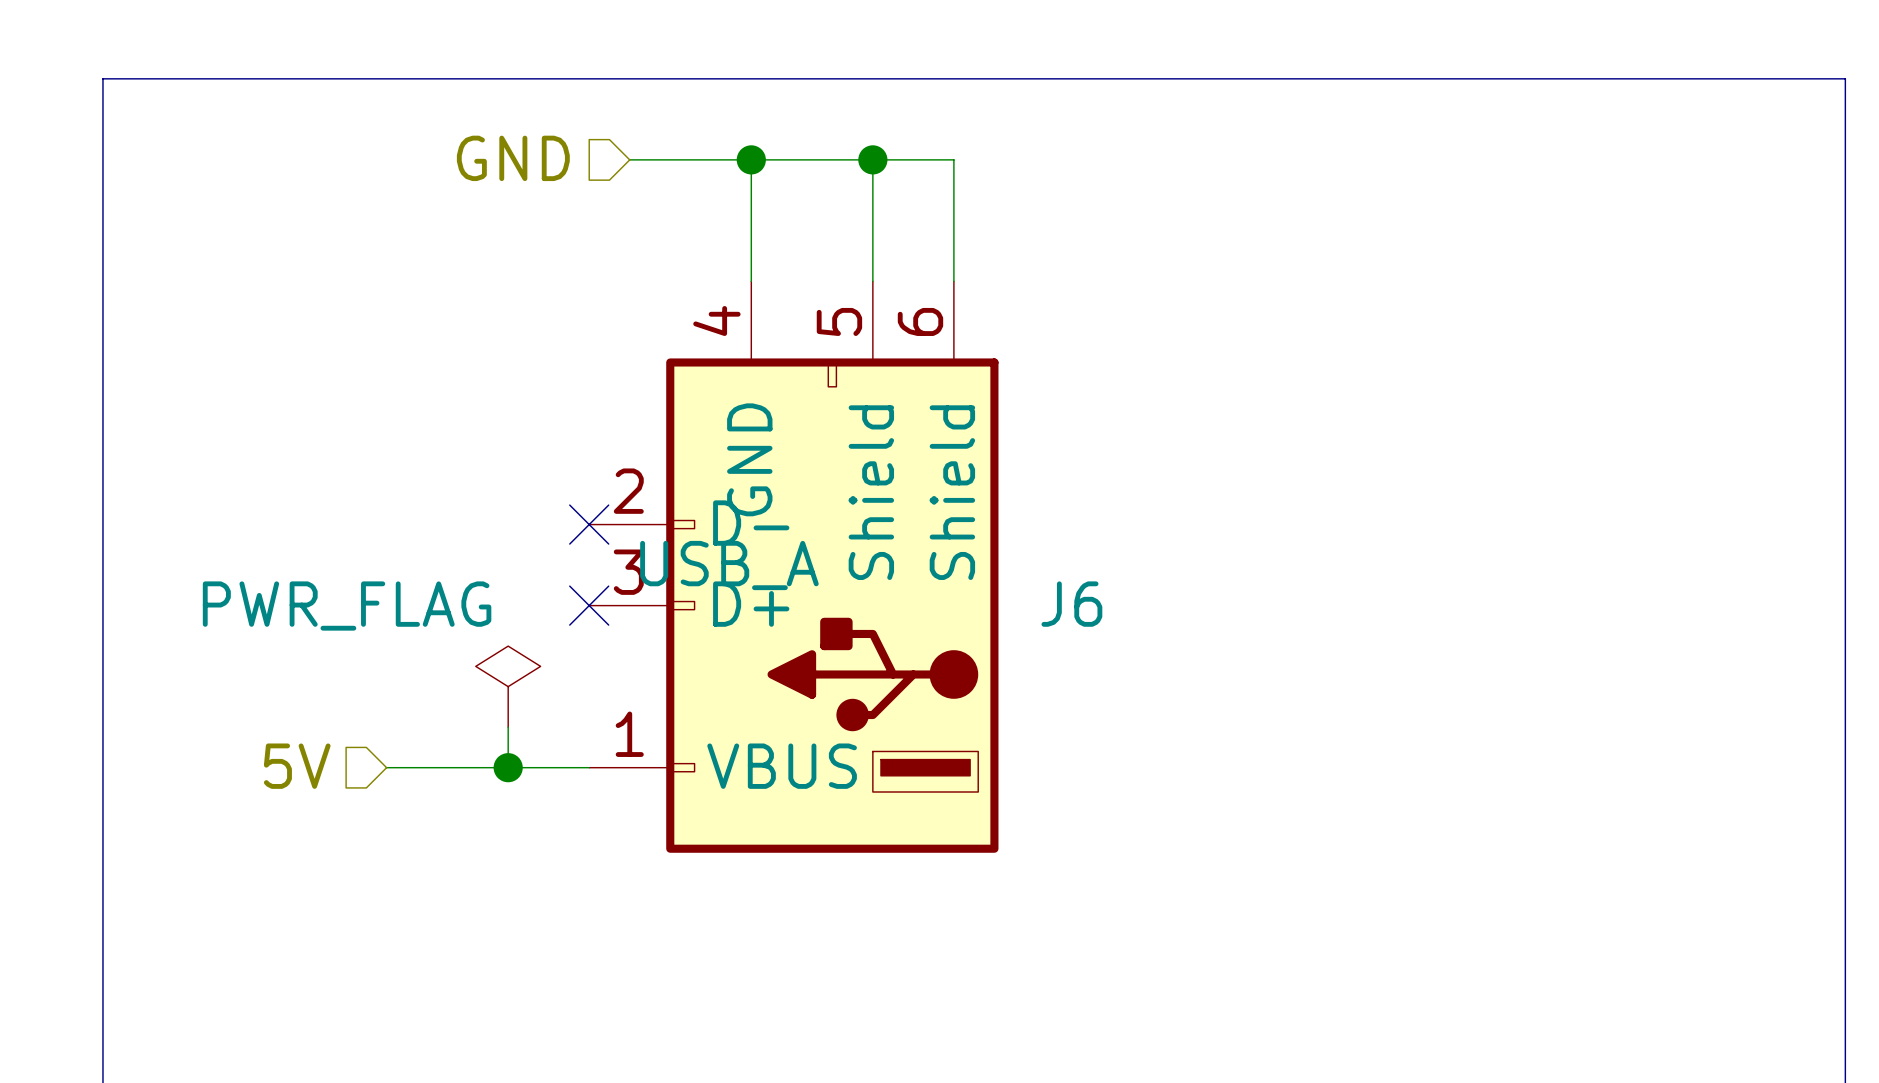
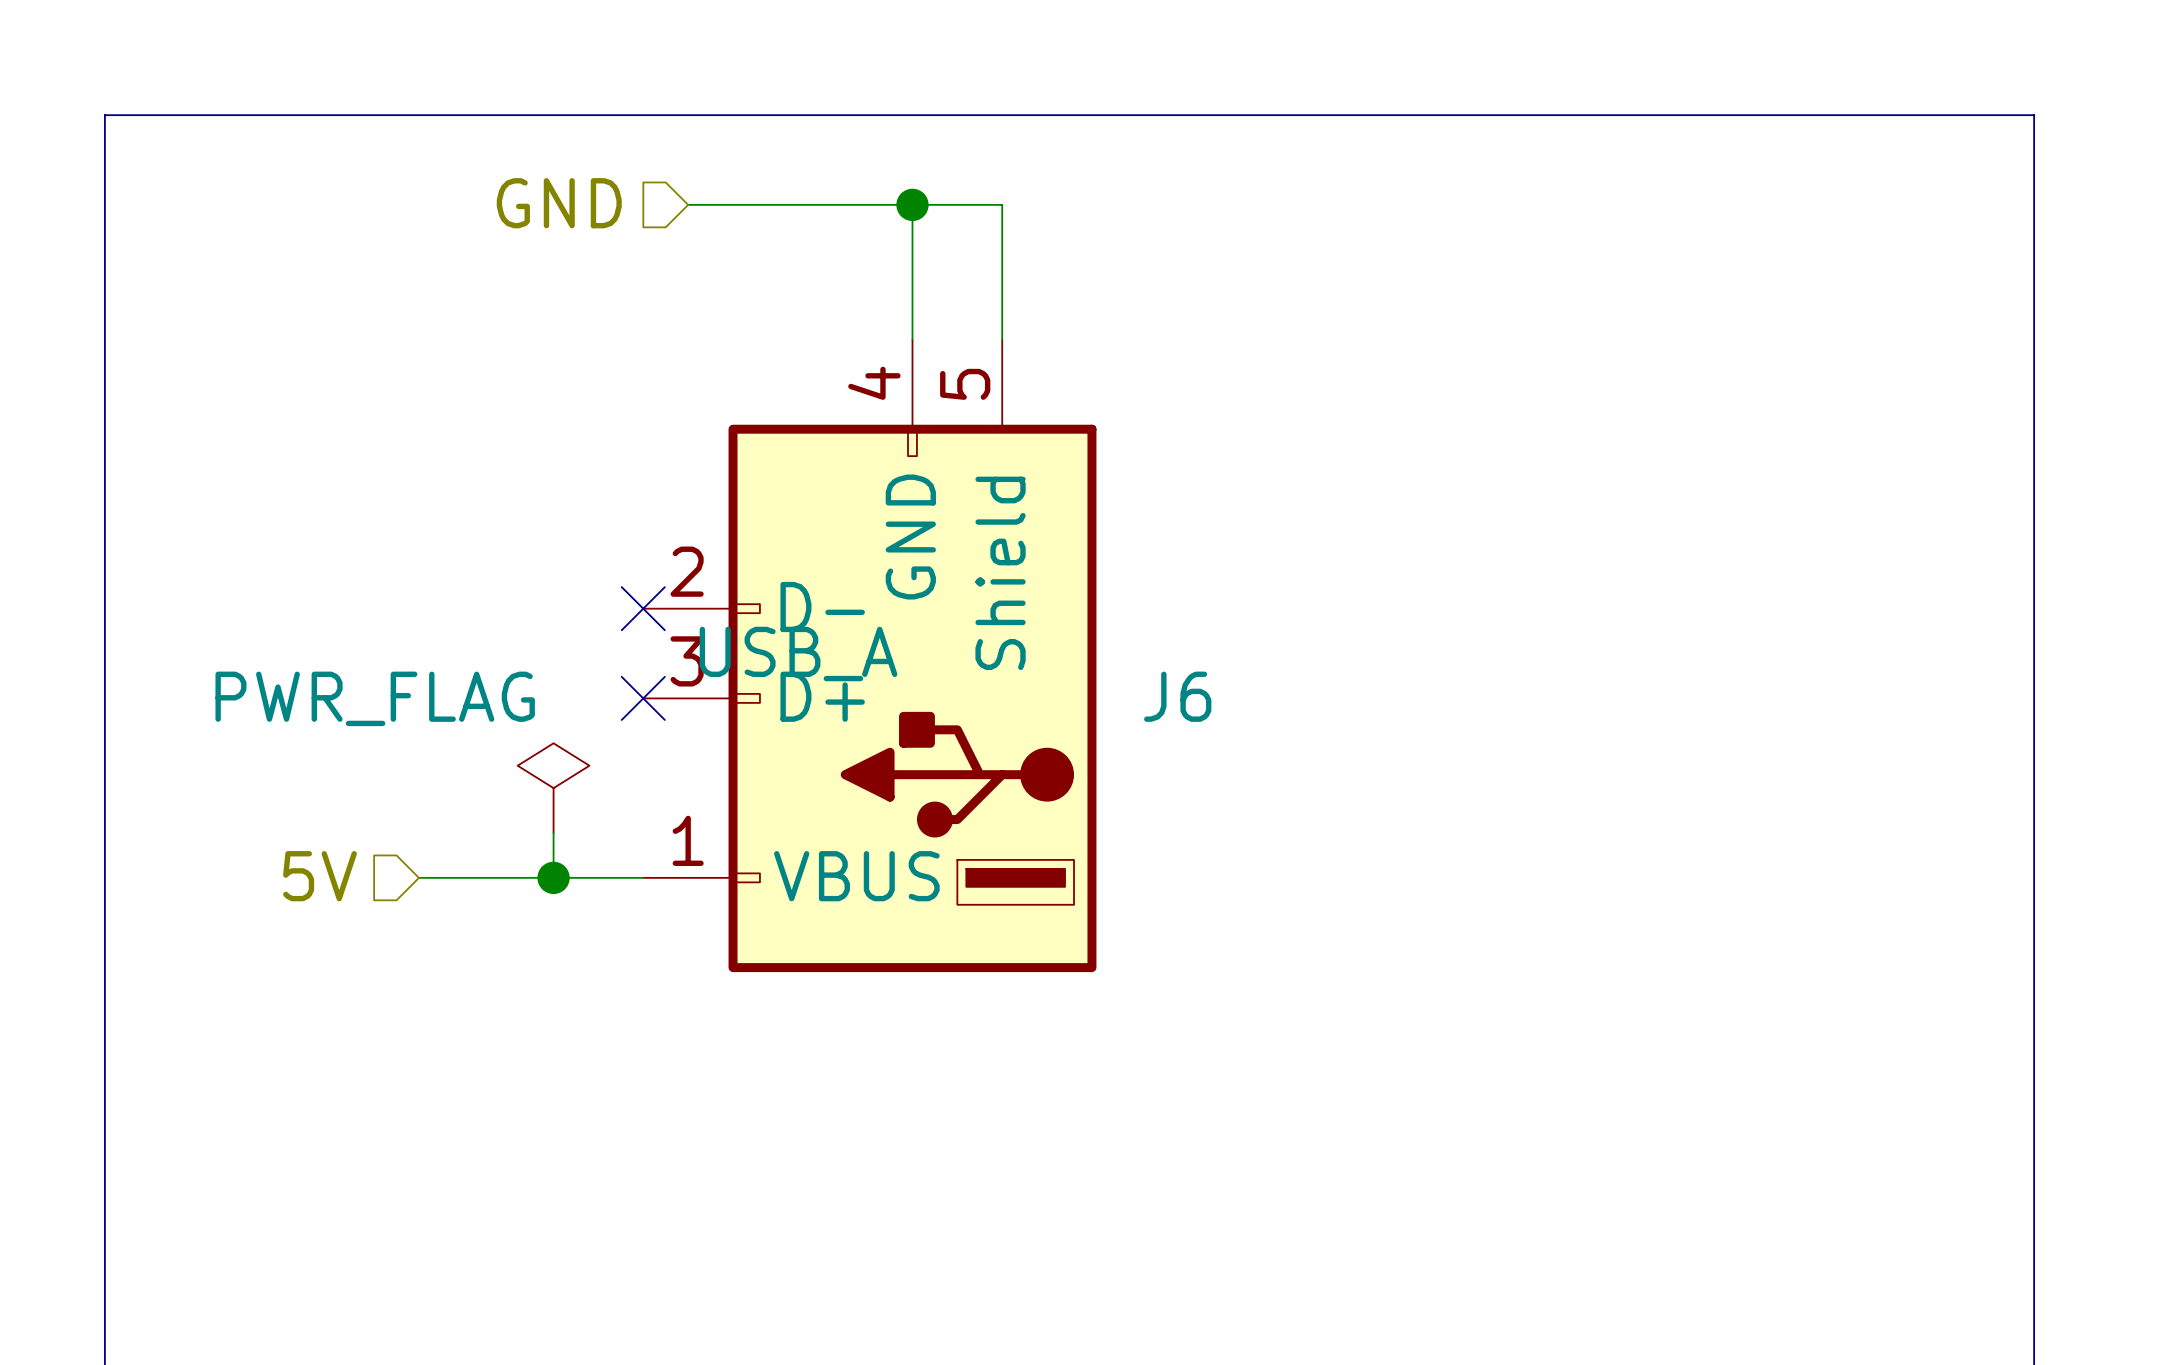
wire: (751, 159) (751, 281) -> none
junction: (751, 159) -> none
junction: none -> (912, 204)
wire: (872, 159) (872, 281) -> (912, 204) (912, 339)
junction: (872, 159) -> none
wire: (913, 159) (953, 159) (953, 281) -> (1002, 204) (1002, 339)
J6 symbol: [589, 281, 999, 853] -> [643, 339, 1097, 973]

